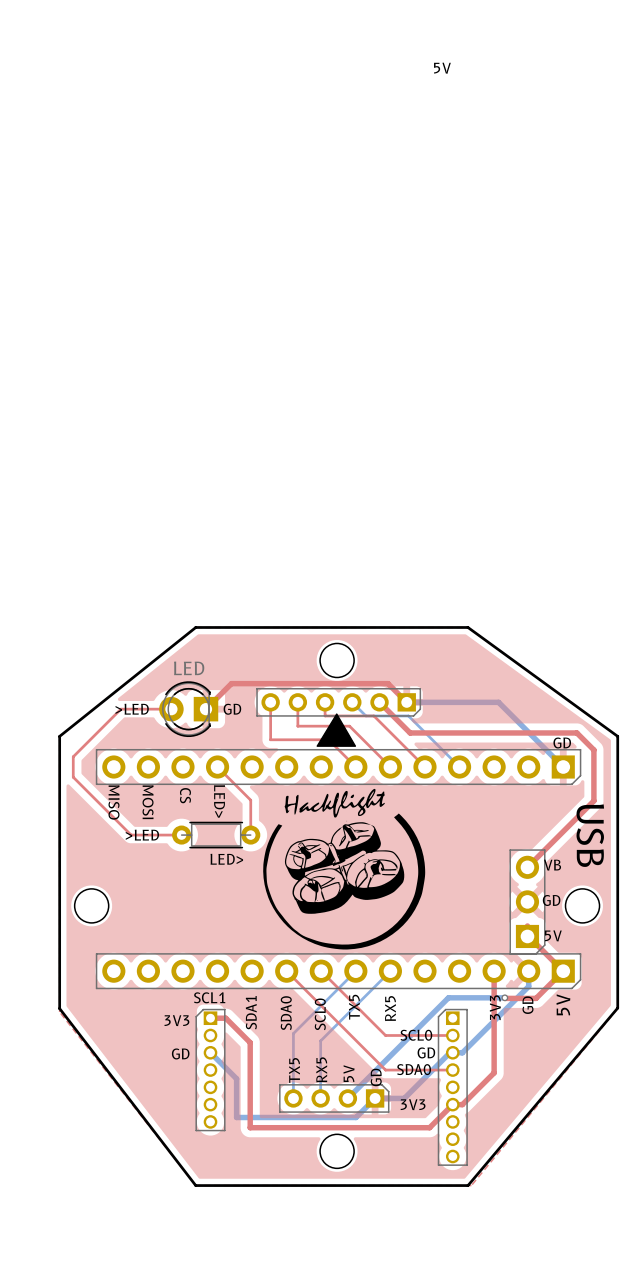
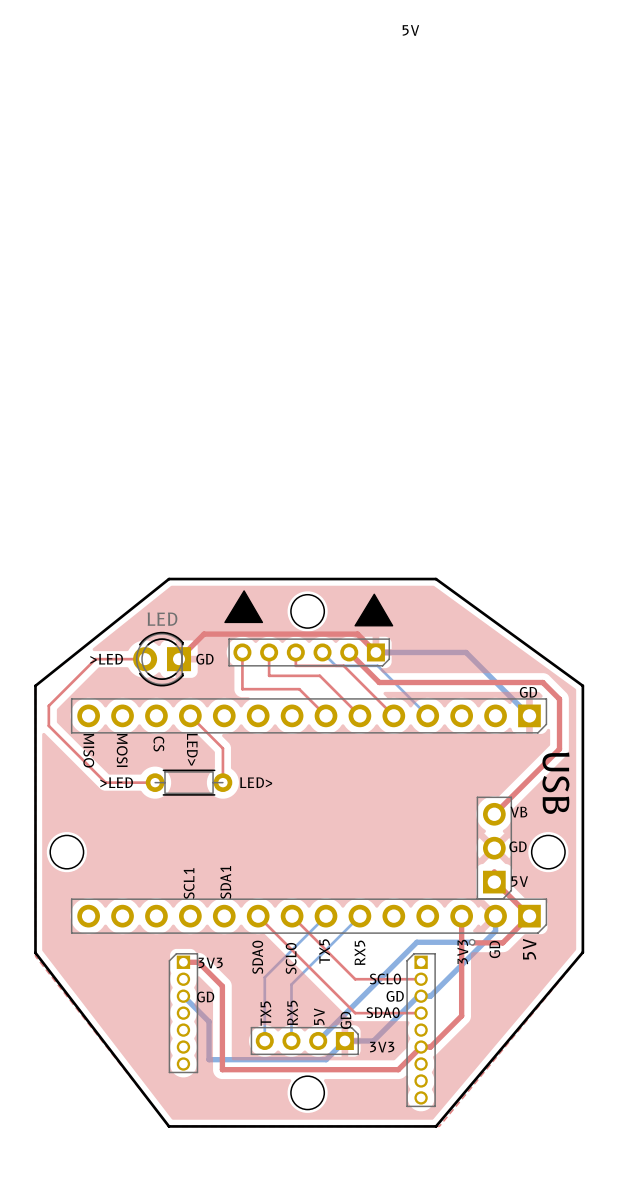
drawing: none -> [224, 590, 264, 624]
drawing: none -> [354, 593, 394, 627]
drawing: [316, 713, 357, 747] -> none
drawing: [263, 788, 426, 950] -> none
text position: LED> (226, 859) -> LED> (256, 782)
text rotation: 0° (209, 997) -> 90° counterclockwise (189, 883)
text position: SCL1 (209, 997) -> SCL1 (189, 883)
text position: SDA1 (251, 1012) -> SDA1 (225, 882)
text position: 3V3 (176, 1020) -> 3V3 (210, 962)
text position: GD (180, 1053) -> GD (205, 997)

